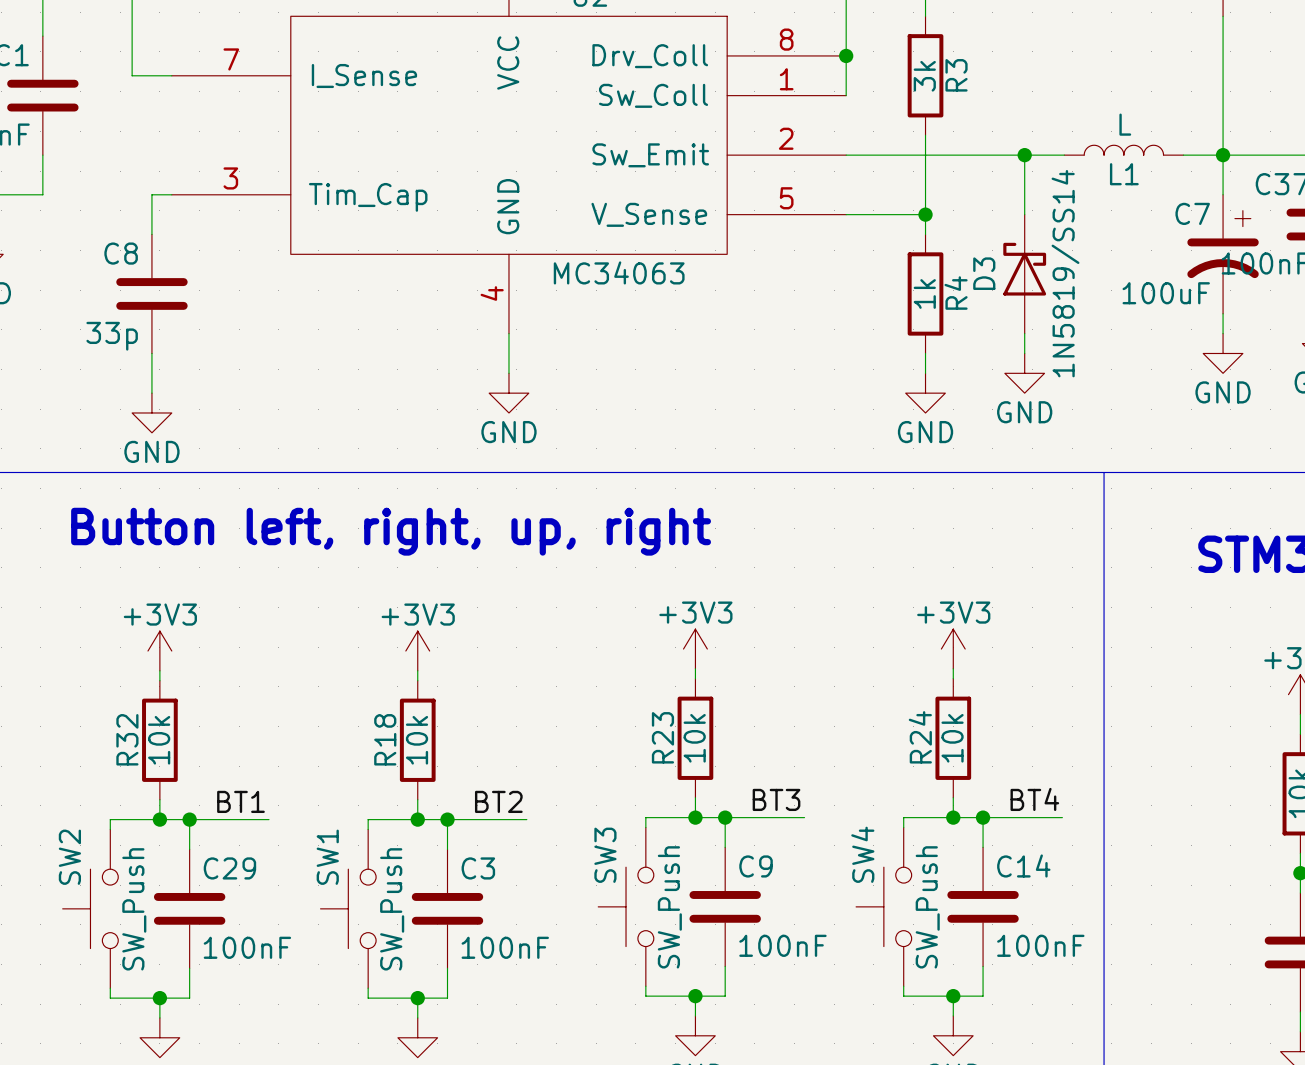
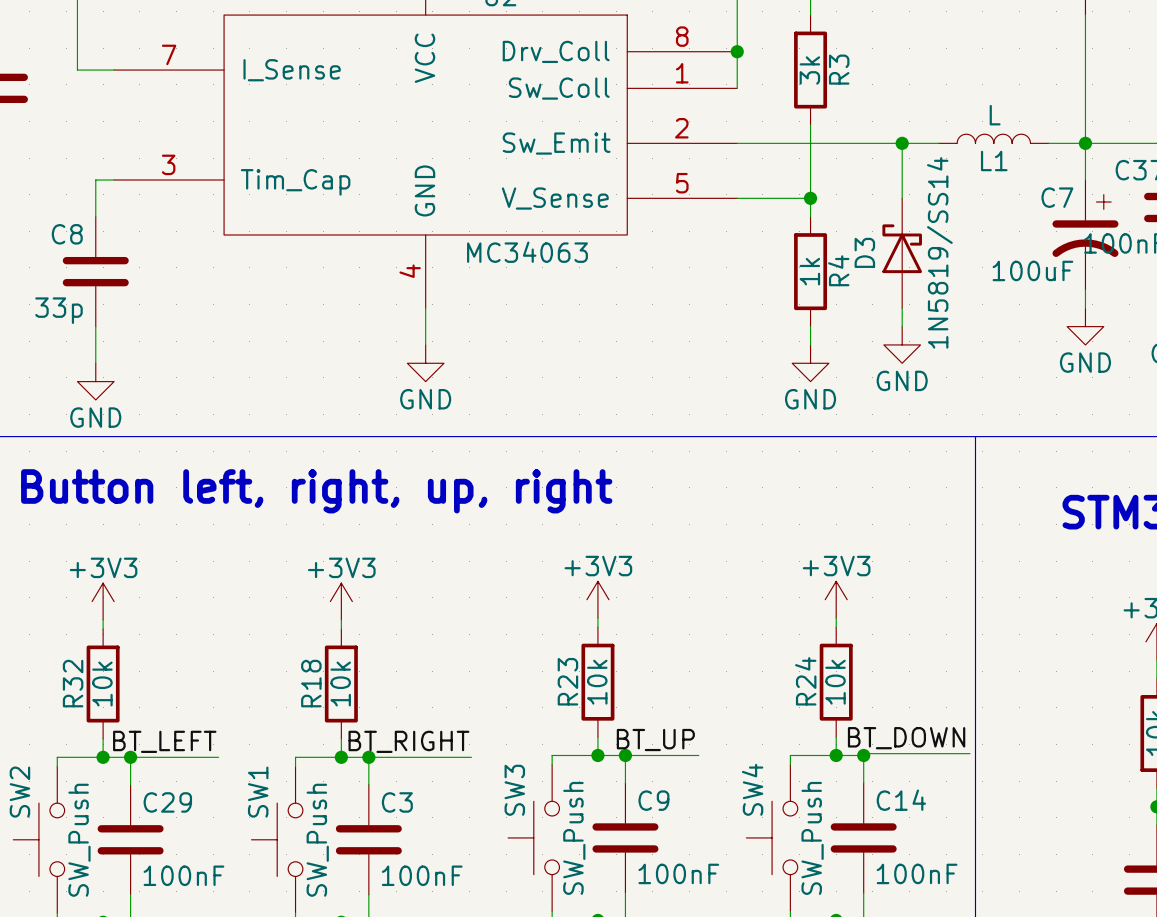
label: none -> BT_DOWN (906, 738)
label: BT3 (776, 799) -> BT_UP (655, 740)
label: BT4 (1034, 799) -> none
label: BT1 (240, 801) -> none
label: BT2 (498, 801) -> none
label: none -> BT_LEFT (164, 741)
label: none -> BT_RIGHT (408, 741)
wire: (983, 817) (1062, 817) -> (863, 755) (863, 753) (969, 753)
wire: none -> (203, 757) (218, 757)
wire: none -> (442, 757) (471, 757)

